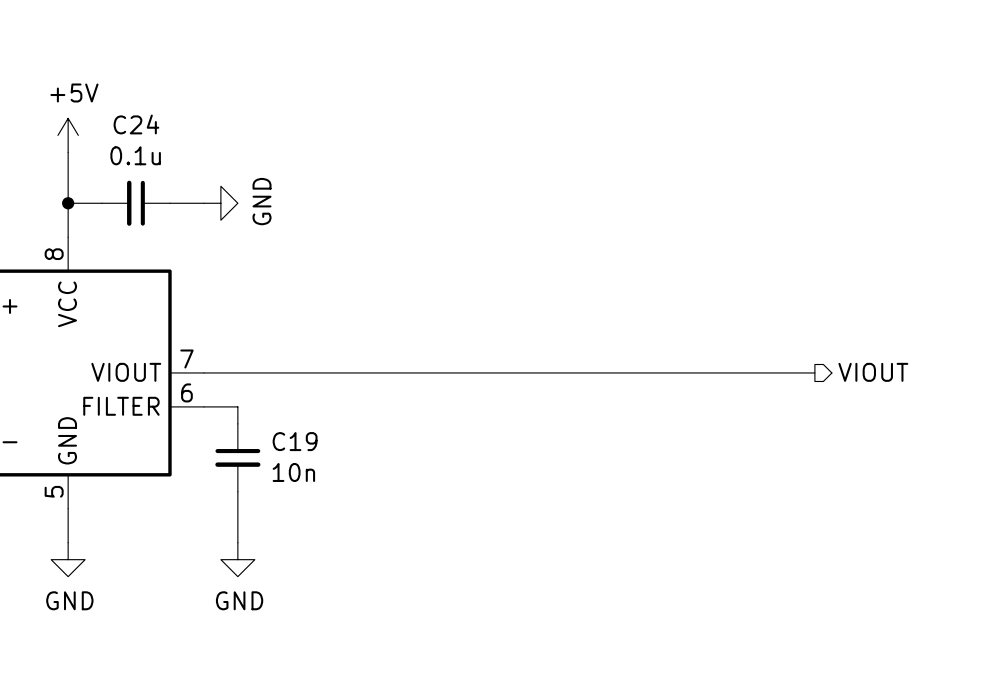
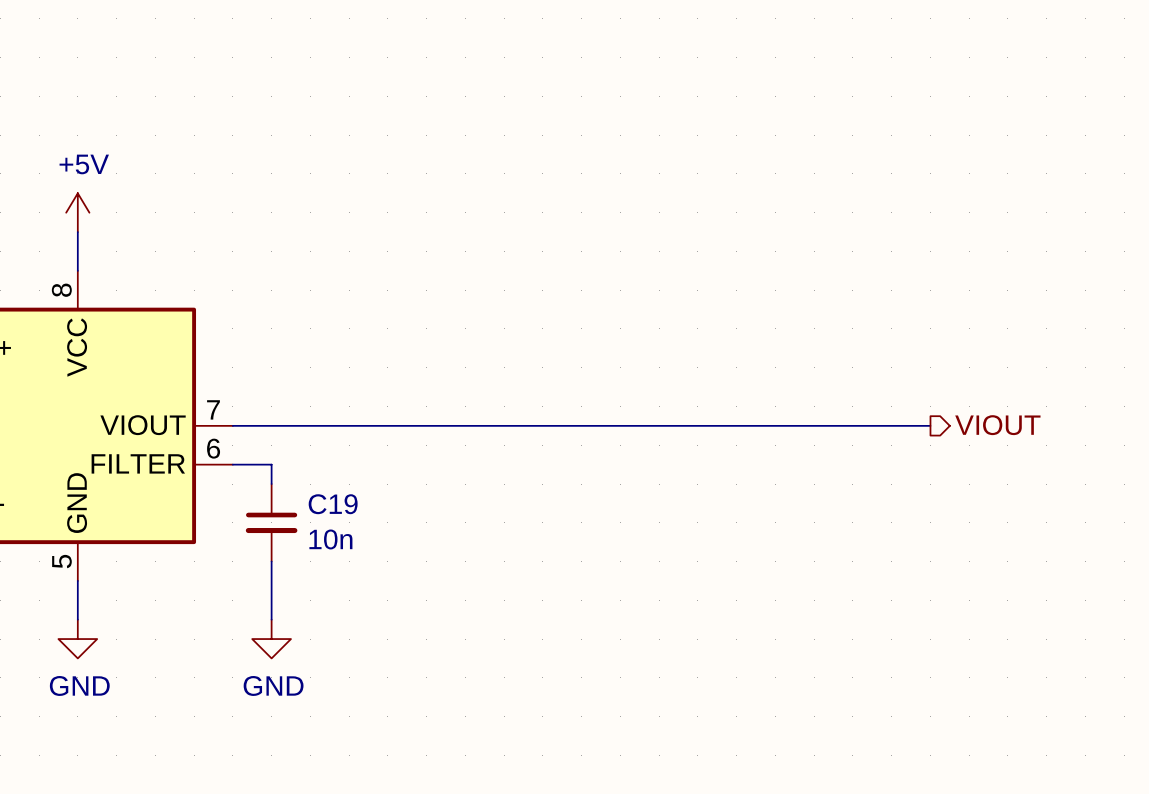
power symbol position: +5V (68, 135) -> +5V (77, 212)
wire: (68, 152) (68, 203) (102, 203) -> none
junction: (68, 203) -> none
C24: 0.1u (136, 203) -> none
wire: (169, 203) (203, 203) -> none
power symbol: GND (220, 203) -> none

